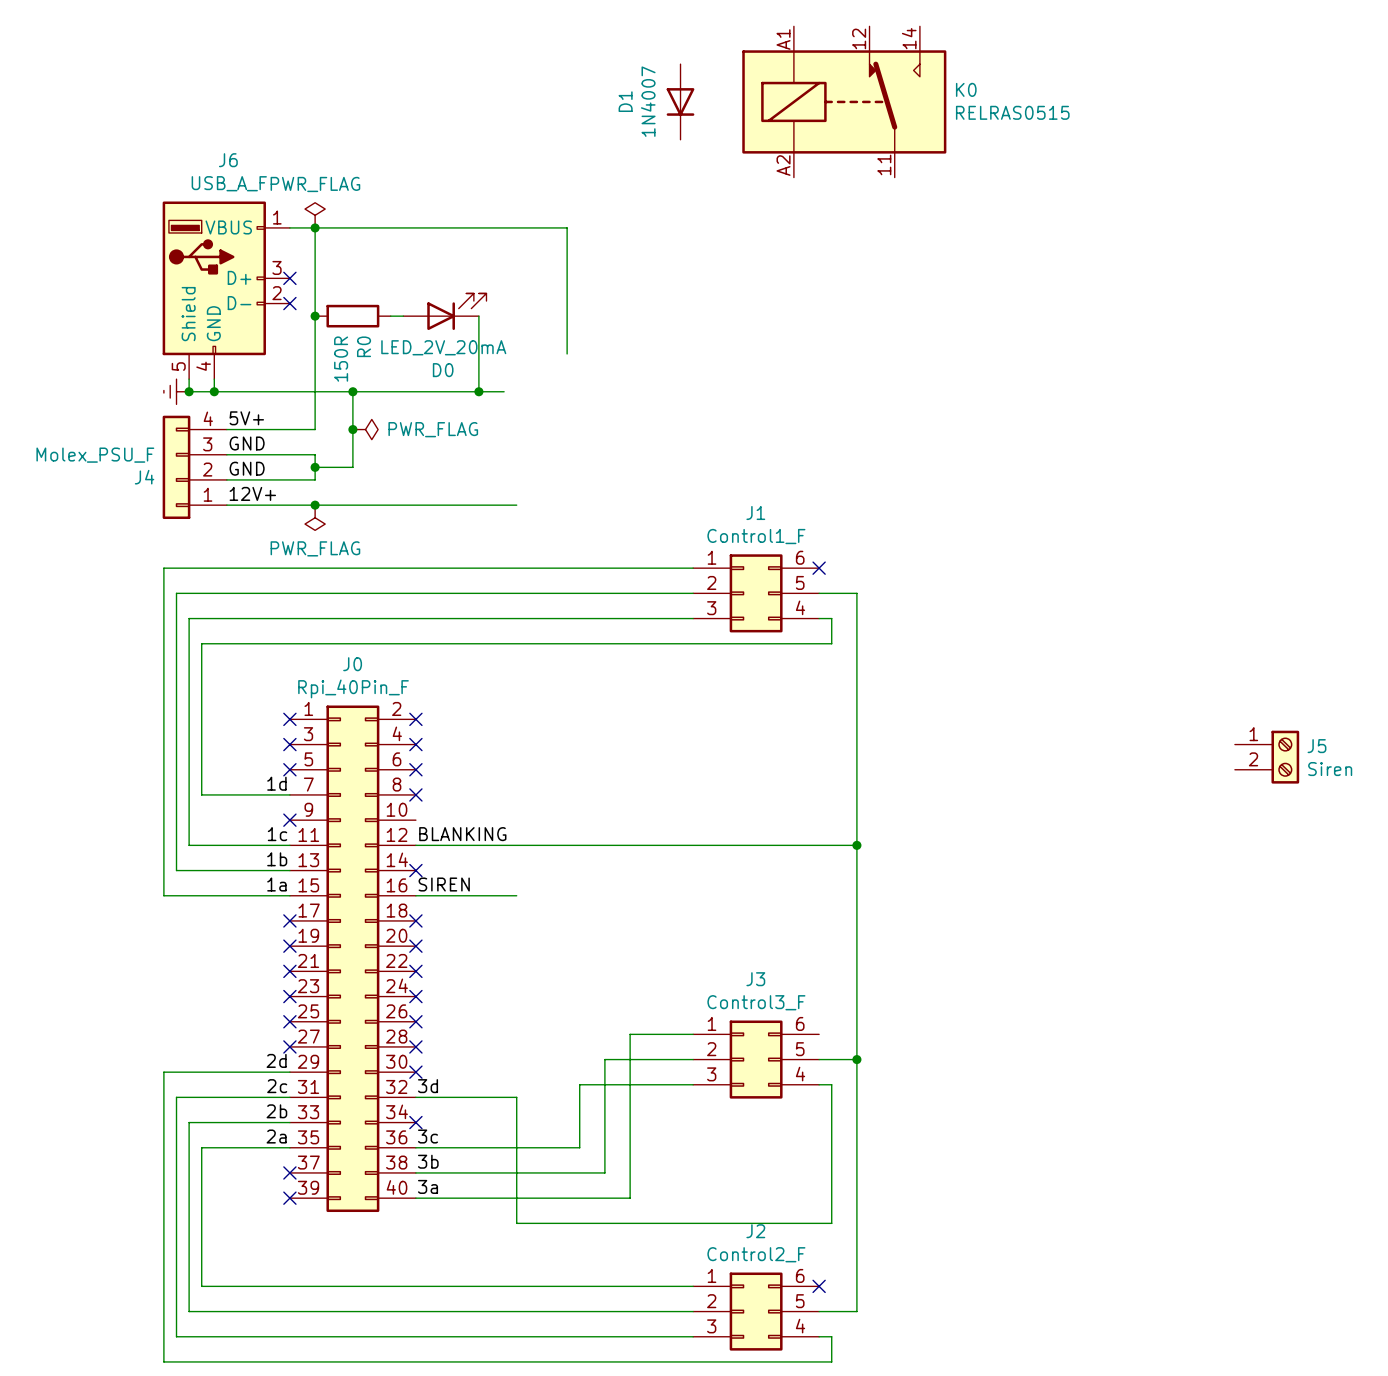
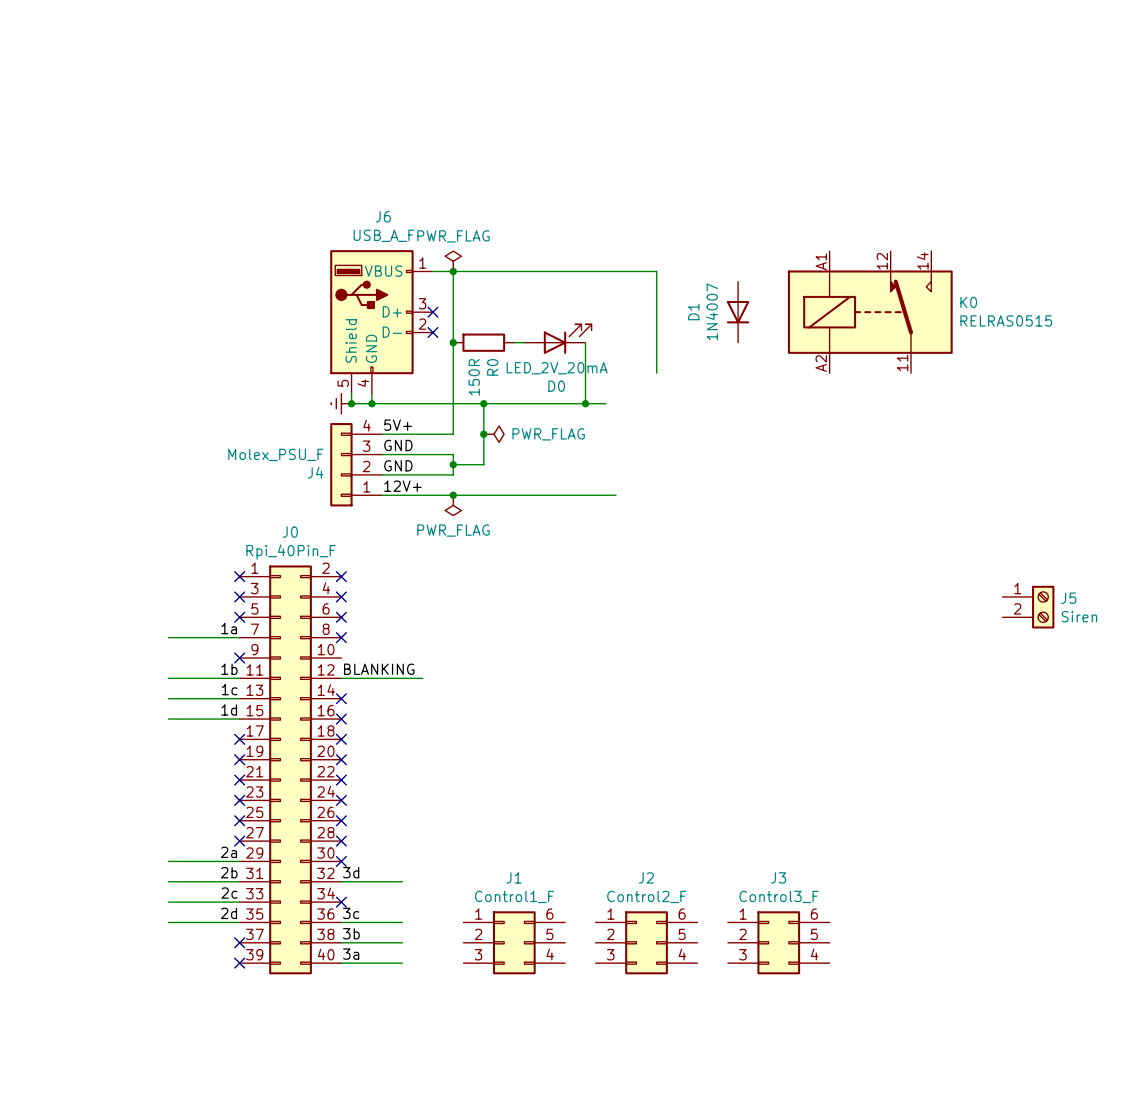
D1 position: (680, 101) -> (738, 312)
K0 position: (844, 101) -> (870, 312)
power symbol: PWR_FLAG (315, 215) -> none
wire: (289, 227) (567, 227) (567, 353) -> none
wire: (315, 227) (315, 429) (226, 429) -> none
junction: (315, 227) -> none
no-connect mark: (289, 278) -> none
J6 position: (226, 290) -> (381, 321)
no-connect mark: (289, 303) -> none
D0 position: (444, 311) -> (558, 339)
junction: (315, 316) -> none
R0 position: (352, 316) -> (483, 342)
wire: (390, 316) (403, 316) -> none
power symbol: none -> PWR_FLAG (453, 261)
wire: none -> (432, 271) (656, 271) (656, 373)
wire: none -> (453, 271) (453, 434) (382, 434)
junction: none -> (453, 271)
wire: (189, 379) (189, 391) (504, 391) -> none
wire: (214, 379) (214, 391) -> none
power symbol: (176, 391) -> none
junction: (189, 391) -> none
junction: (214, 391) -> none
wire: (352, 391) (352, 467) (315, 467) -> none
junction: (352, 391) -> none
junction: (478, 391) -> none
no-connect mark: none -> (432, 312)
no-connect mark: none -> (432, 332)
label: 5V+ (246, 418) -> none
junction: (352, 429) -> none
power symbol: PWR_FLAG (365, 429) -> none
junction: none -> (453, 342)
wire: none -> (514, 342) (524, 342)
wire: none -> (585, 342) (585, 403)
label: GND (247, 443) -> none
wire: (226, 454) (315, 454) (315, 479) (226, 479) -> none
J4 position: (194, 467) -> (356, 464)
junction: (315, 467) -> none
label: GND (247, 468) -> none
wire: none -> (371, 393) (371, 403)
label: 12V+ (252, 493) -> none
wire: (226, 505) (428, 505) -> (351, 393) (351, 403)
junction: (315, 505) -> none
power symbol: none -> (341, 403)
junction: none -> (351, 403)
junction: none -> (371, 403)
wire: none -> (422, 403) (605, 403)
wire: none -> (483, 403) (483, 464) (453, 464)
junction: none -> (483, 403)
junction: none -> (585, 403)
power symbol: PWR_FLAG (315, 517) -> none
label: none -> 5V+ (398, 425)
junction: none -> (483, 434)
power symbol: none -> PWR_FLAG (493, 434)
label: none -> GND (398, 445)
wire: (466, 568) (163, 568) (163, 895) (201, 895) -> none
wire: (554, 568) (693, 568) -> (453, 454) (453, 474)
no-connect mark: (819, 568) -> none
junction: none -> (453, 464)
label: none -> GND (398, 465)
wire: (466, 593) (176, 593) (176, 870) (201, 870) -> none
wire: (554, 593) (693, 593) -> none
J1 position: (756, 593) -> (514, 942)
wire: (819, 593) (856, 593) (856, 1311) (819, 1311) -> none
label: none -> 12V+ (402, 486)
wire: (466, 618) (189, 618) (189, 845) (201, 845) -> none
junction: none -> (453, 495)
wire: (819, 618) (831, 618) (831, 643) (201, 643) (201, 794) -> none
power symbol: none -> PWR_FLAG (453, 505)
label: 1d (276, 783) -> 1a (229, 628)
label: 1c (277, 834) -> 1b (229, 669)
wire: (516, 845) (856, 845) -> none
junction: (856, 845) -> none
label: 1b (277, 859) -> 1c (229, 689)
label: 1a (276, 884) -> 1d (229, 709)
label: SIREN (444, 884) -> none
wire: (415, 895) (516, 895) -> none
no-connect mark: none -> (341, 719)
wire: (693, 1034) (630, 1034) (630, 1198) (491, 1198) -> none
wire: (693, 1059) (604, 1059) (604, 1172) (491, 1172) -> none
J3 position: (756, 1059) -> (778, 942)
wire: (819, 1059) (856, 1059) -> none
junction: (856, 1059) -> none
label: 2d (276, 1060) -> 2a (228, 852)
wire: (201, 1072) (163, 1072) (163, 1361) (831, 1361) (831, 1336) (819, 1336) -> none
wire: (693, 1084) (579, 1084) (579, 1147) (491, 1147) -> none
wire: (819, 1084) (831, 1084) (831, 1223) (516, 1223) (516, 1097) (491, 1097) -> none
label: 2c (277, 1086) -> 2b (229, 872)
wire: (201, 1097) (176, 1097) (176, 1336) (693, 1336) -> none
label: 2b (276, 1111) -> 2c (229, 893)
wire: (201, 1122) (189, 1122) (189, 1311) (693, 1311) -> none
label: 2a (276, 1136) -> 2d (228, 913)
wire: (201, 1147) (201, 1286) (693, 1286) -> none
no-connect mark: (819, 1286) -> none
J2 position: (756, 1311) -> (646, 942)

